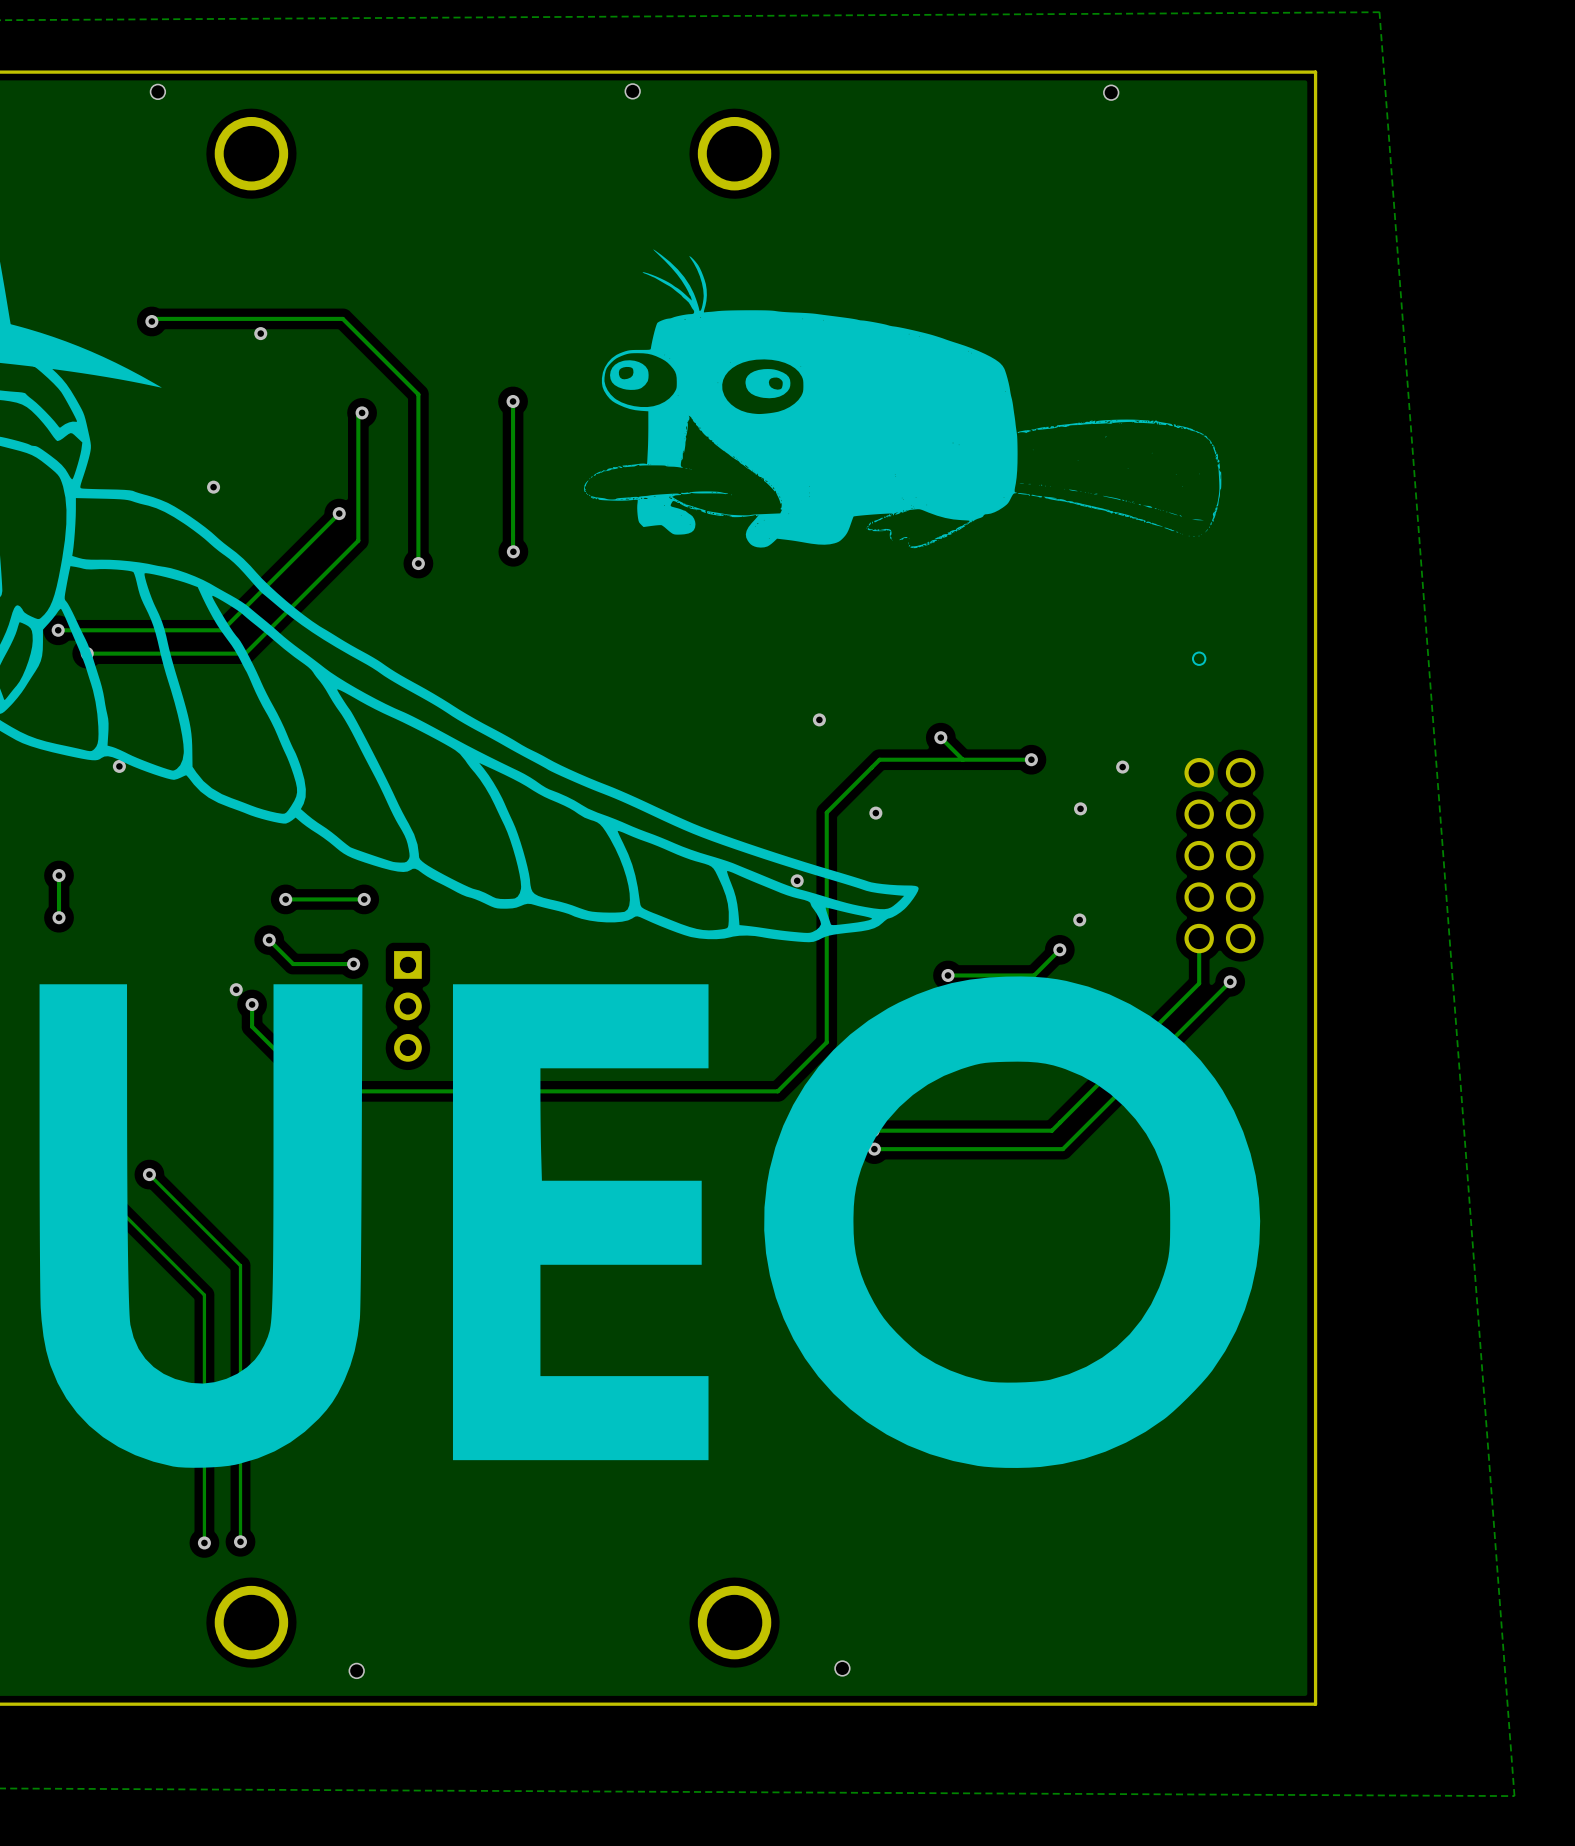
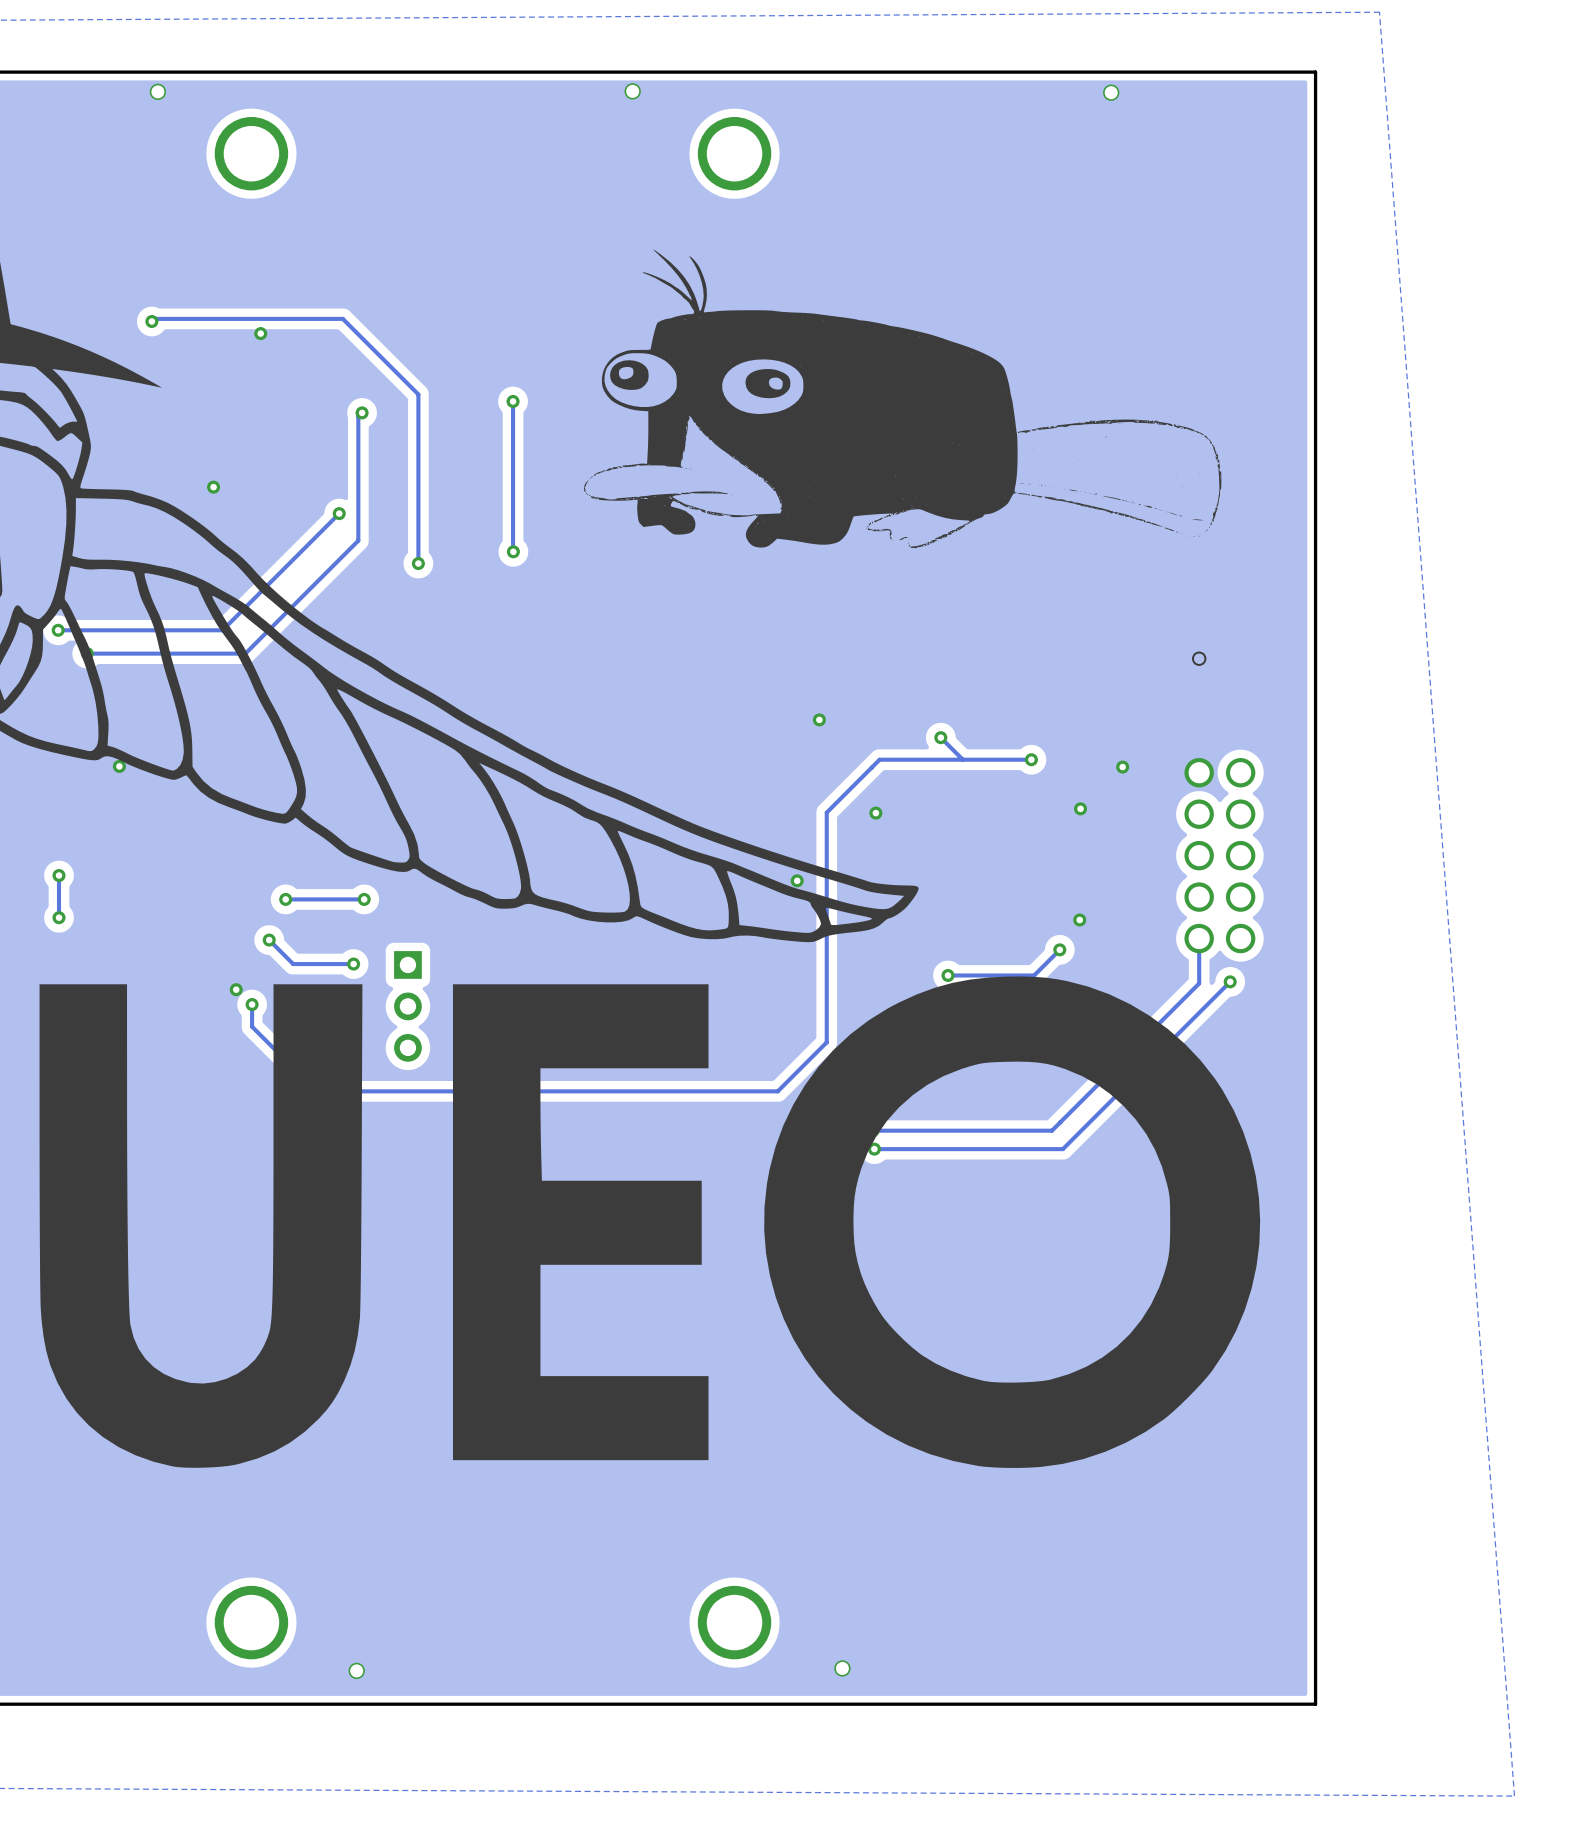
track: (149, 1174) (240, 1265) (240, 1541) -> none
via: (149, 1174) -> none
track: (94, 1185) (204, 1295) (204, 1542) -> none
via: (240, 1541) -> none
via: (204, 1542) -> none

